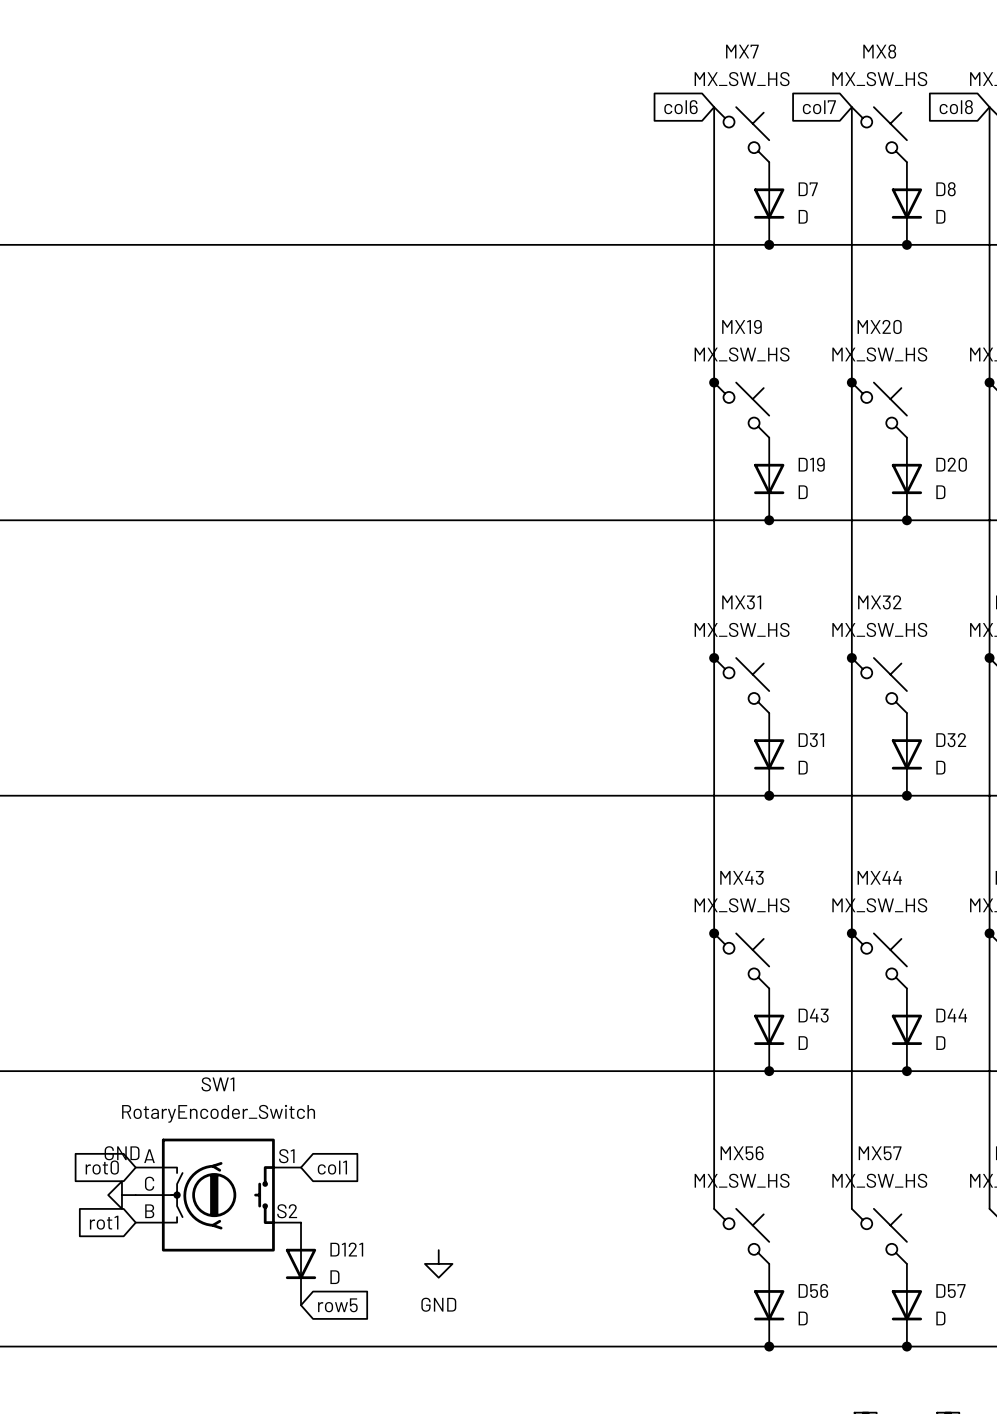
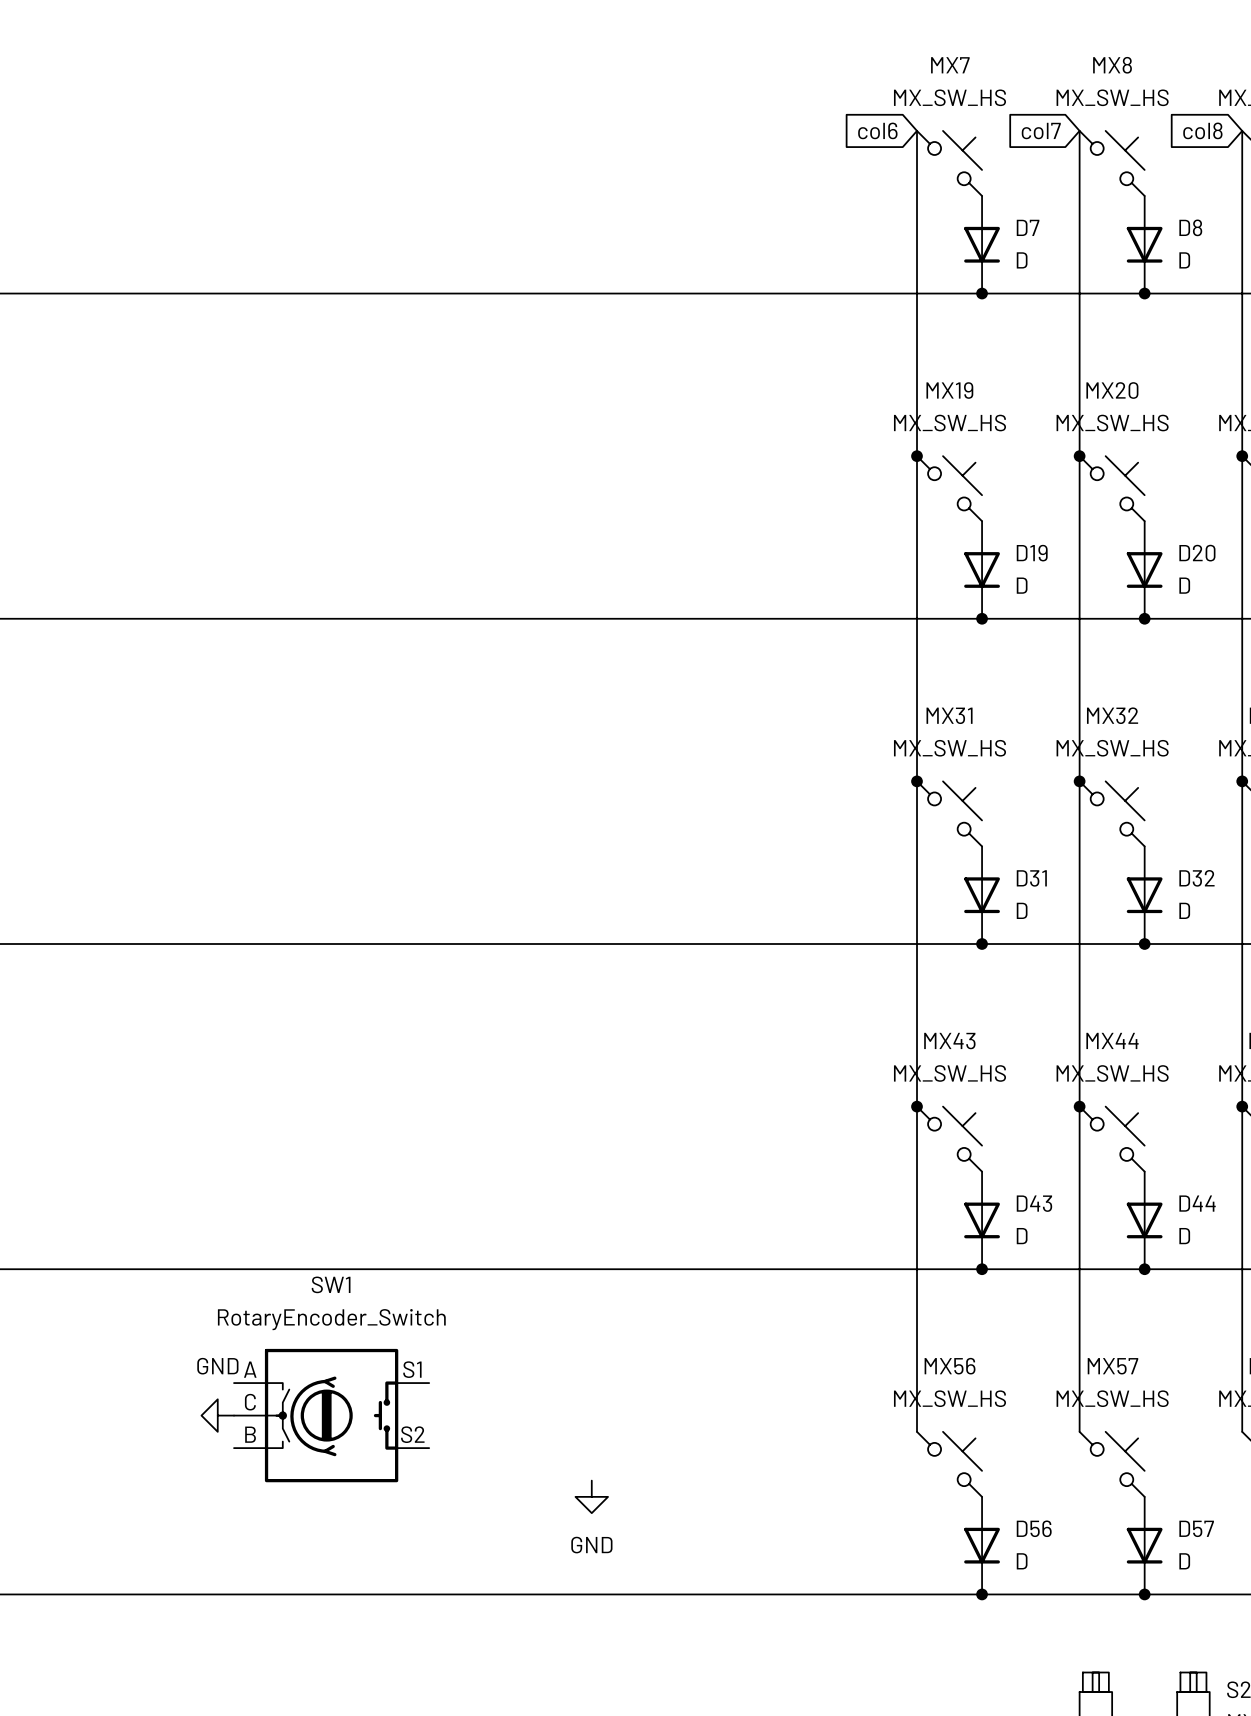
global label: rot0 (102, 1167) -> none
global label: col1 (332, 1167) -> none
global label: rot1 (104, 1222) -> none
D121: D (301, 1263) -> none
global label: row5 (337, 1305) -> none

